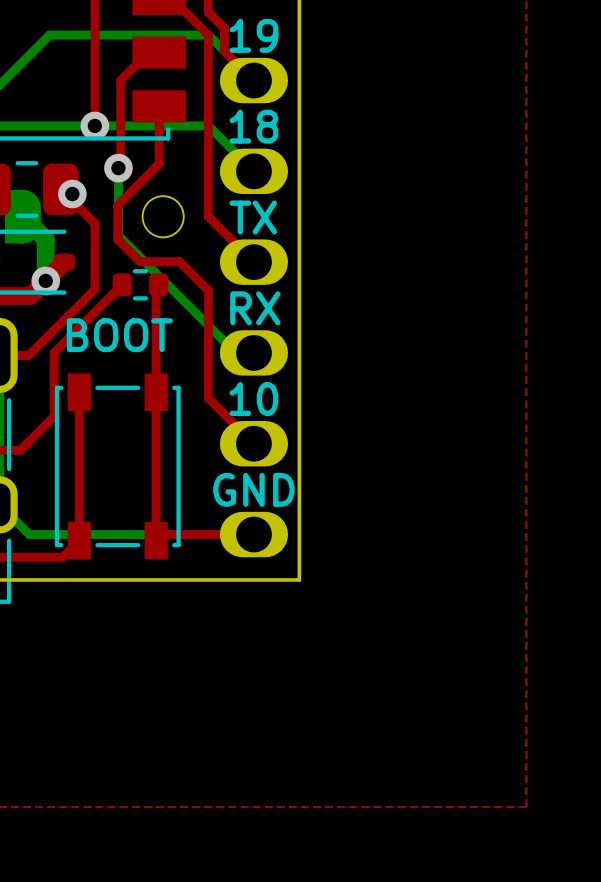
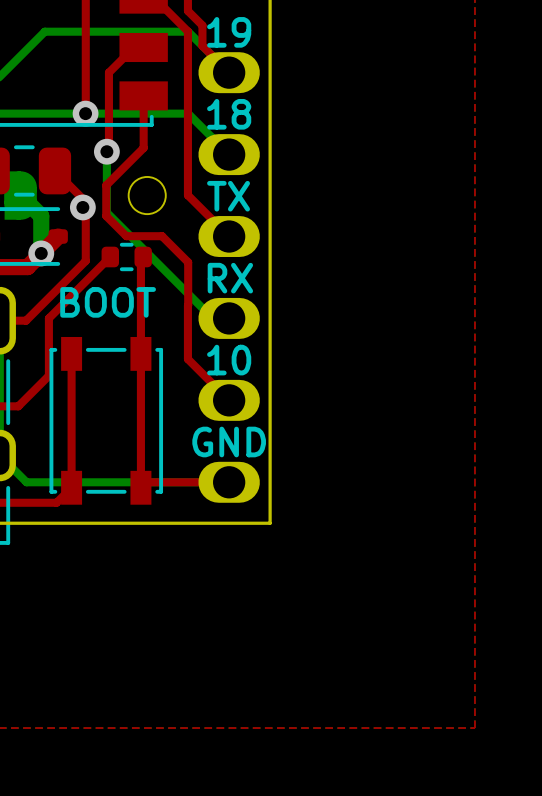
via position: (72, 194) -> (82, 207)

